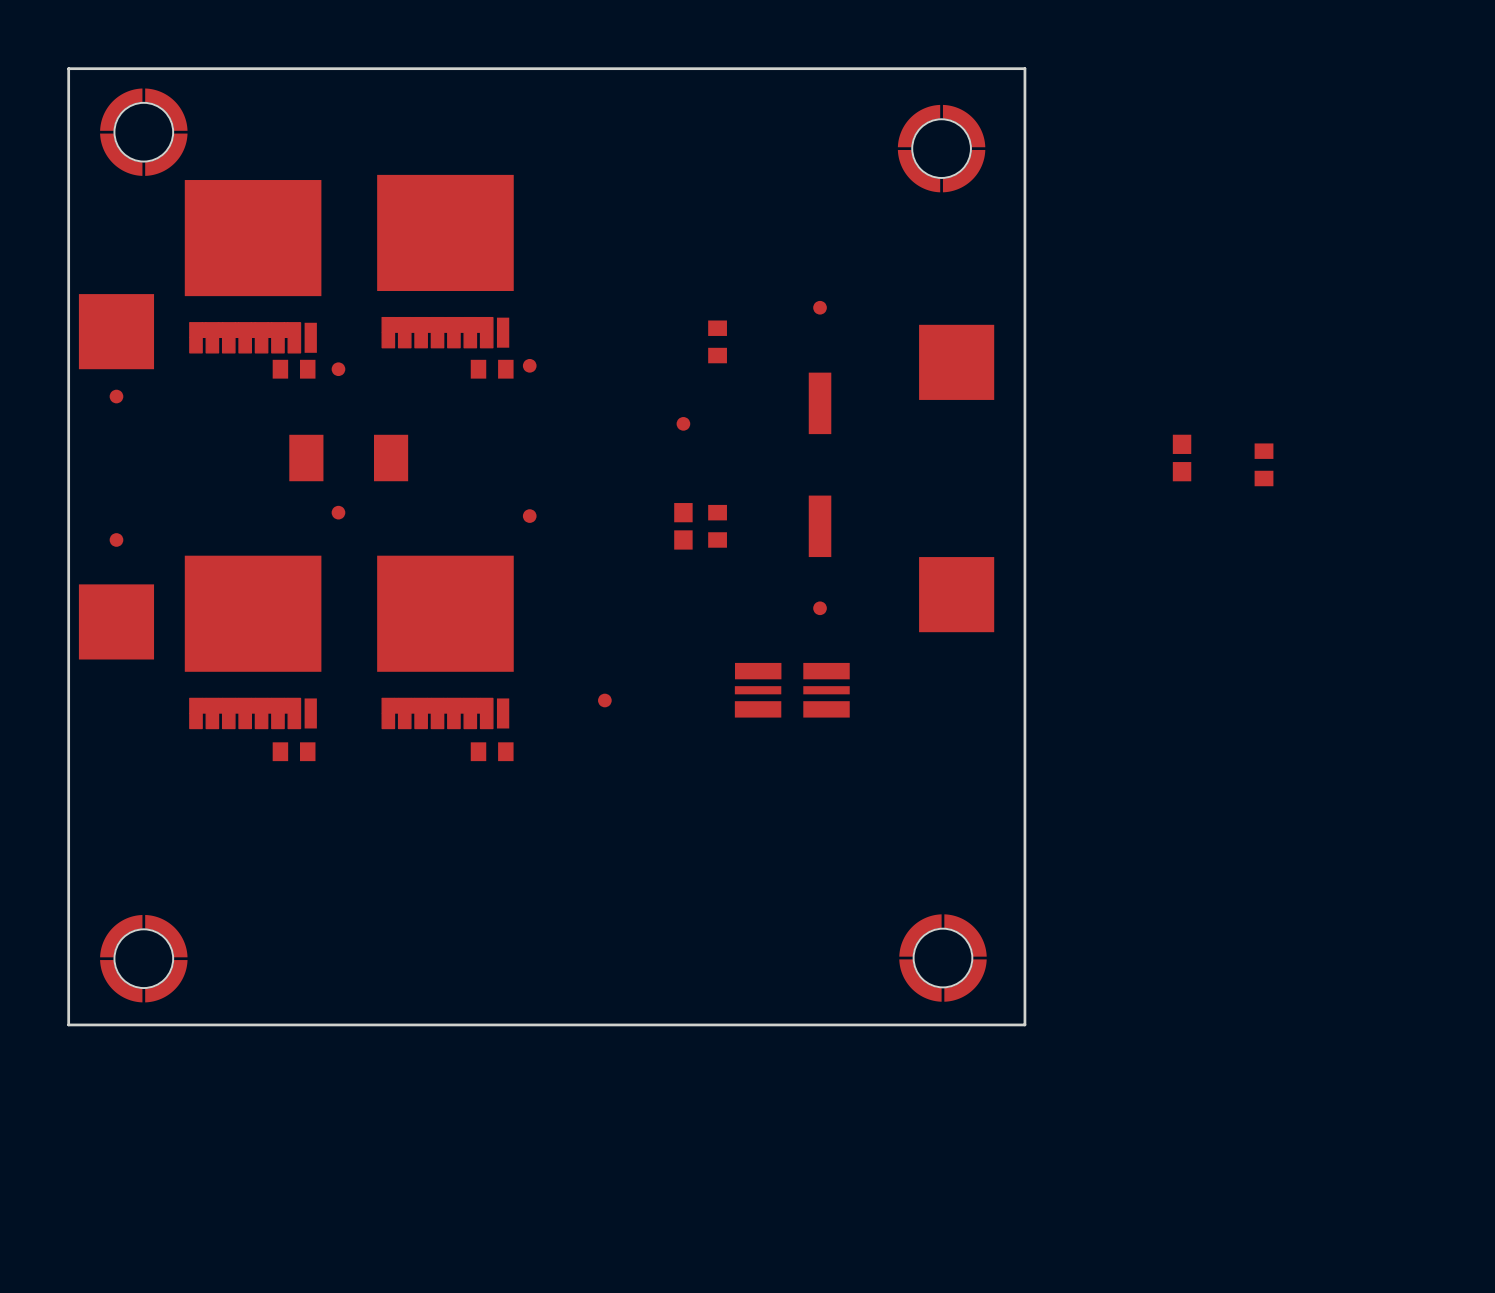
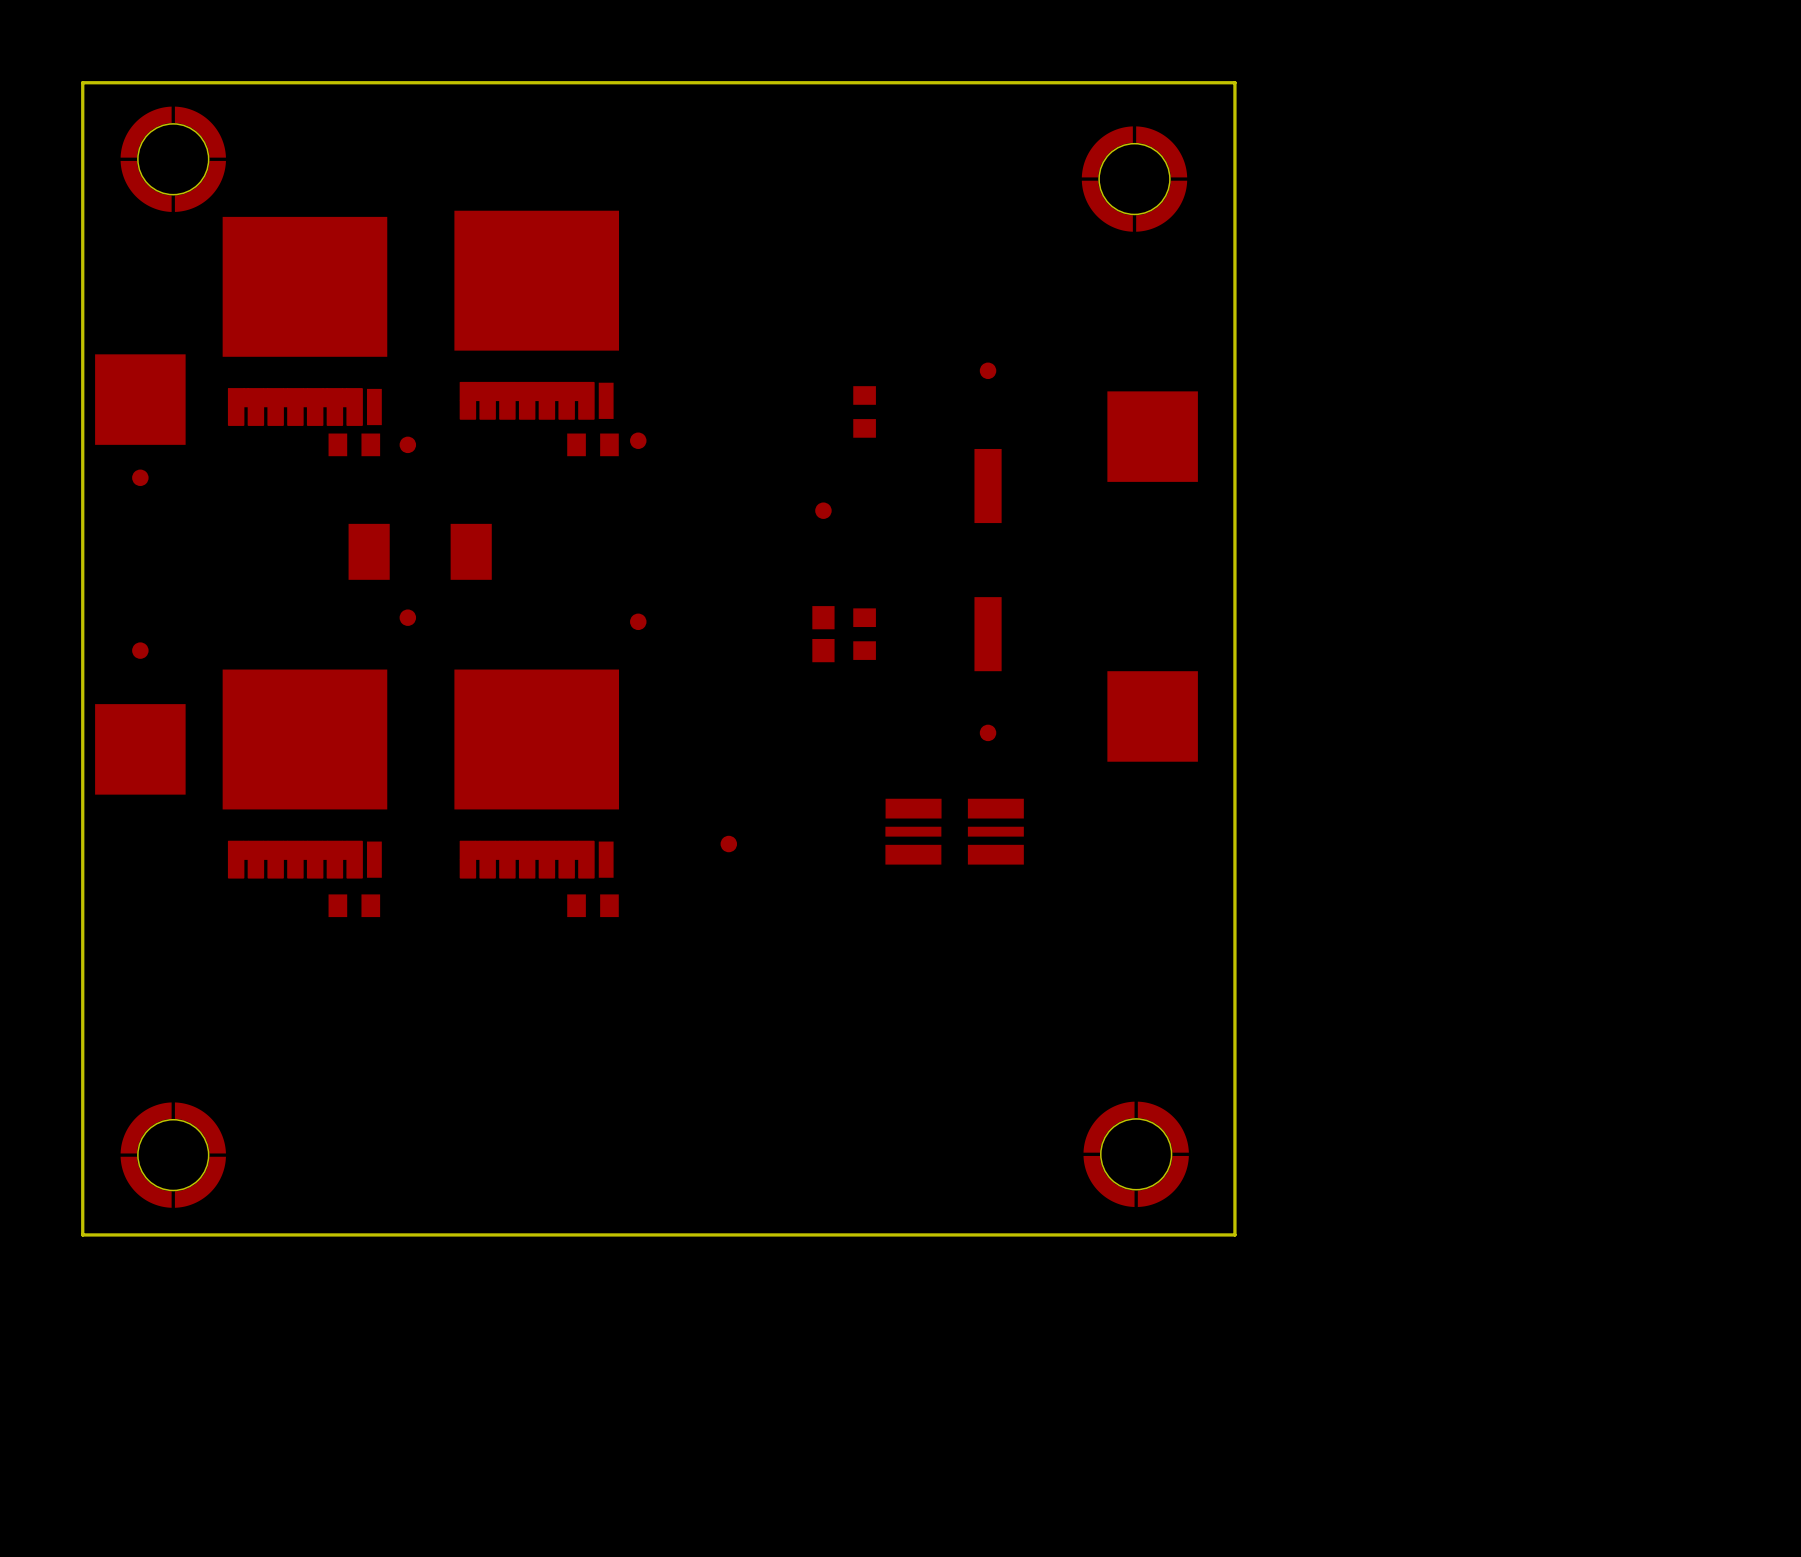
part: (1182, 458) -> none
part: (1264, 464) -> none

